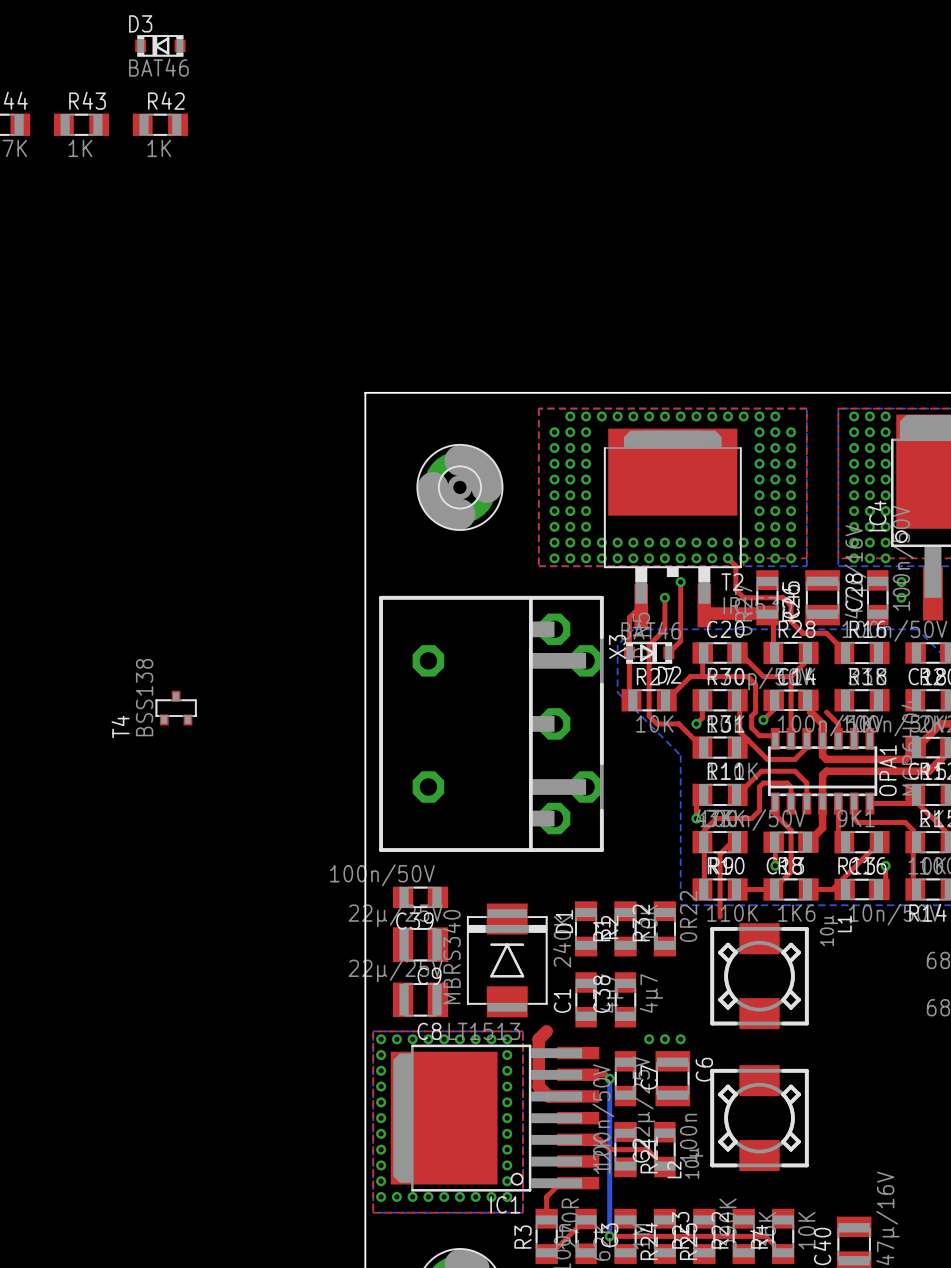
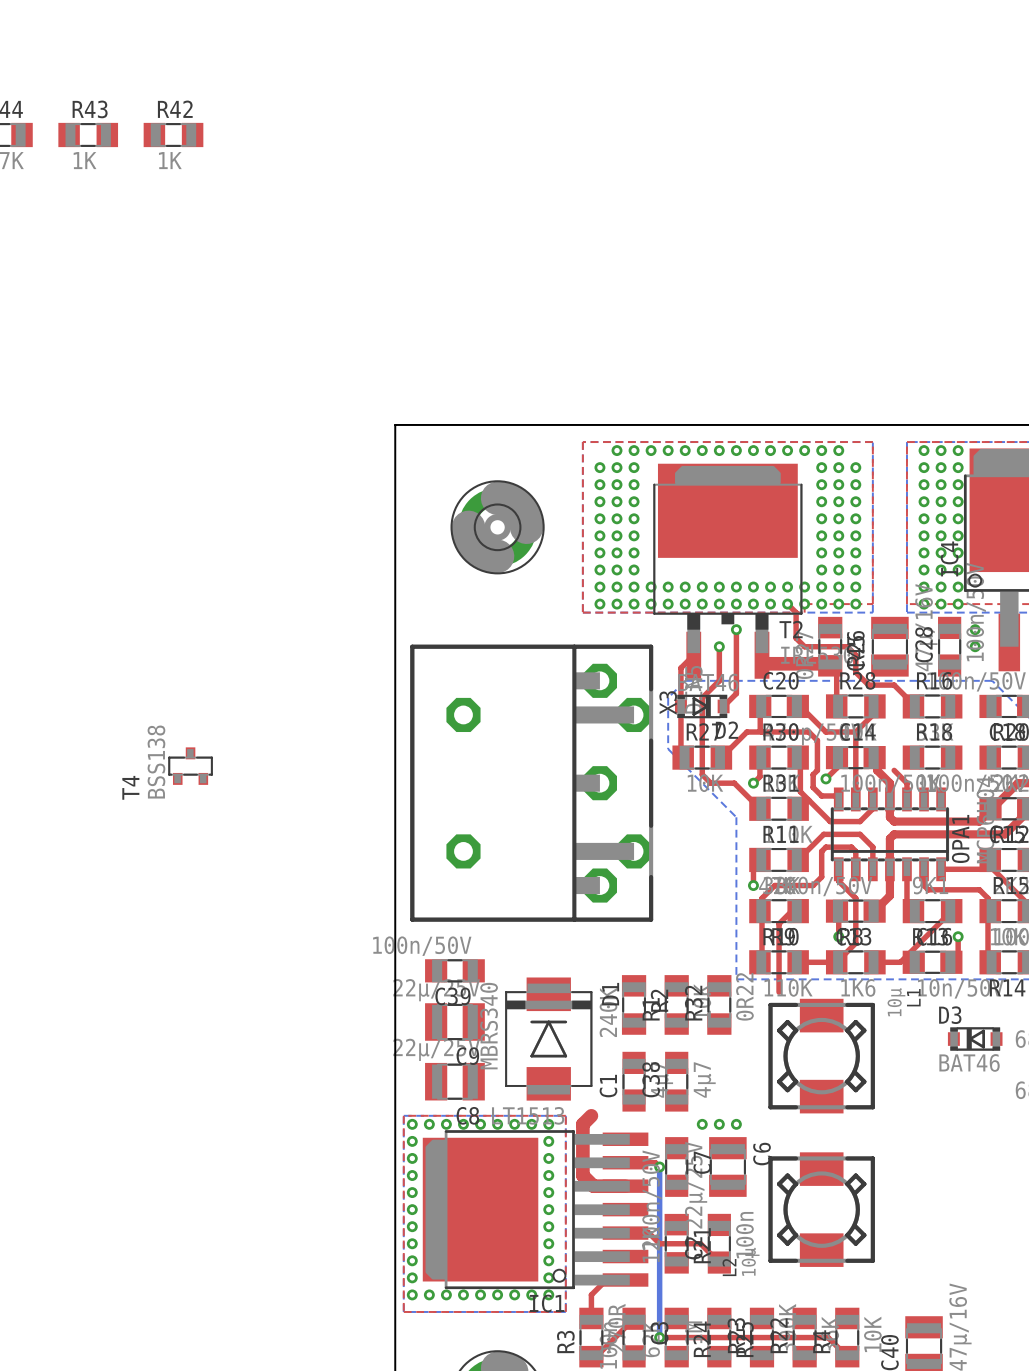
D3 position: (160, 45) -> (975, 1038)

